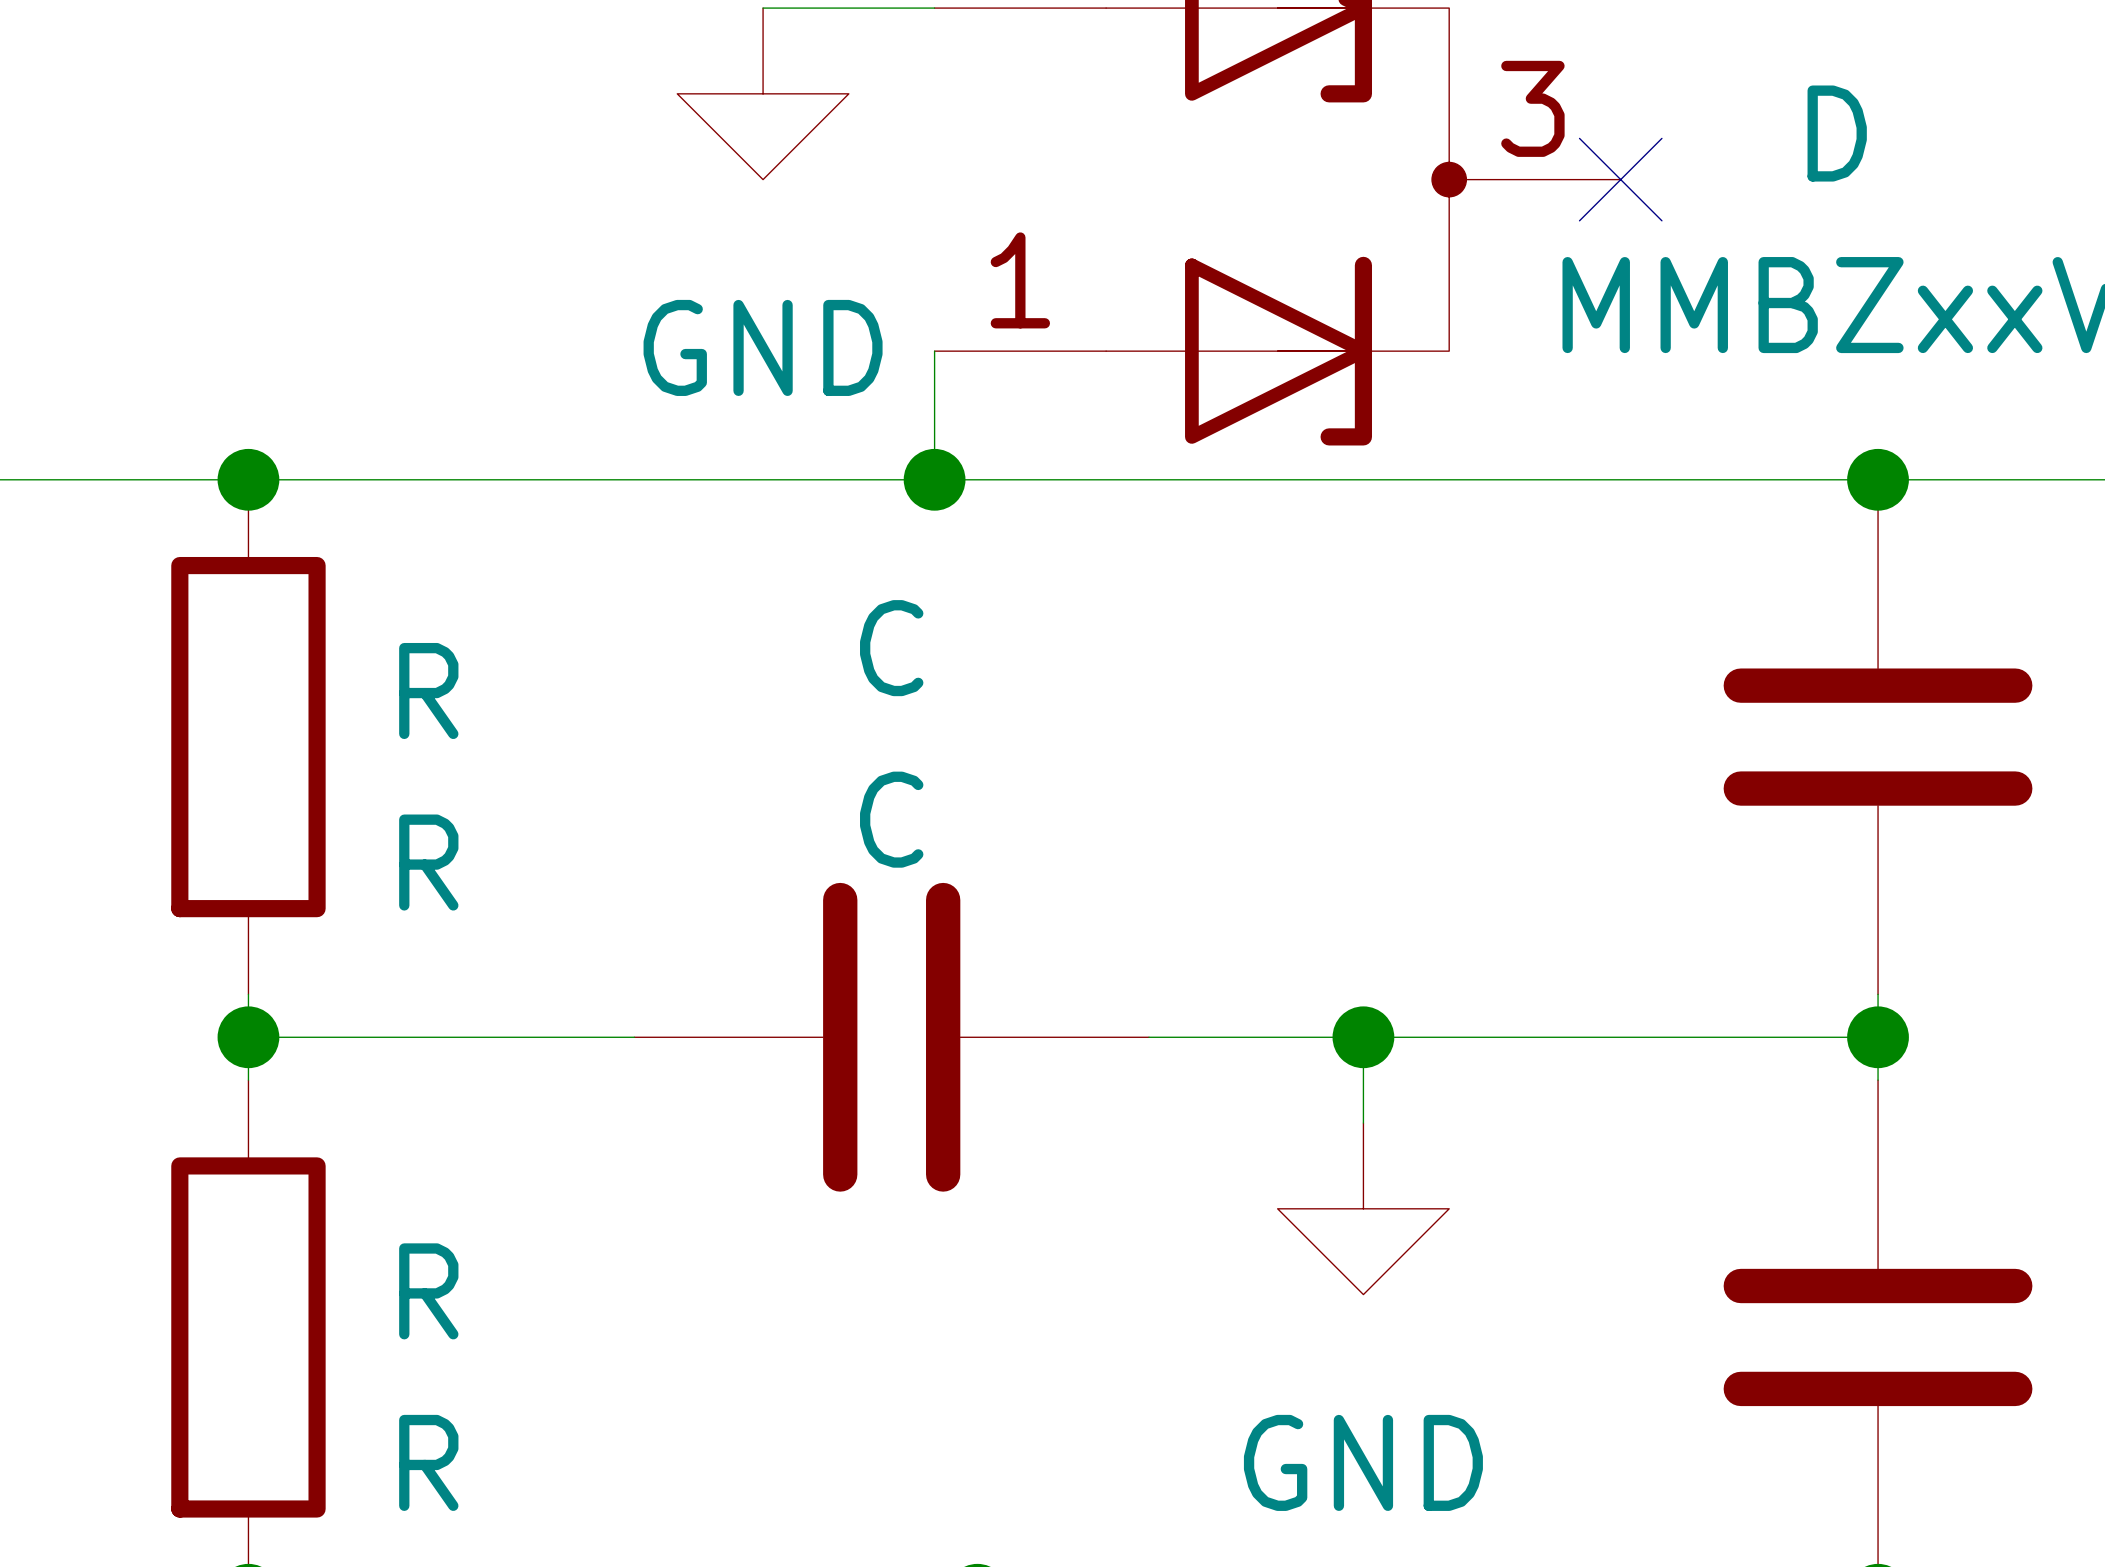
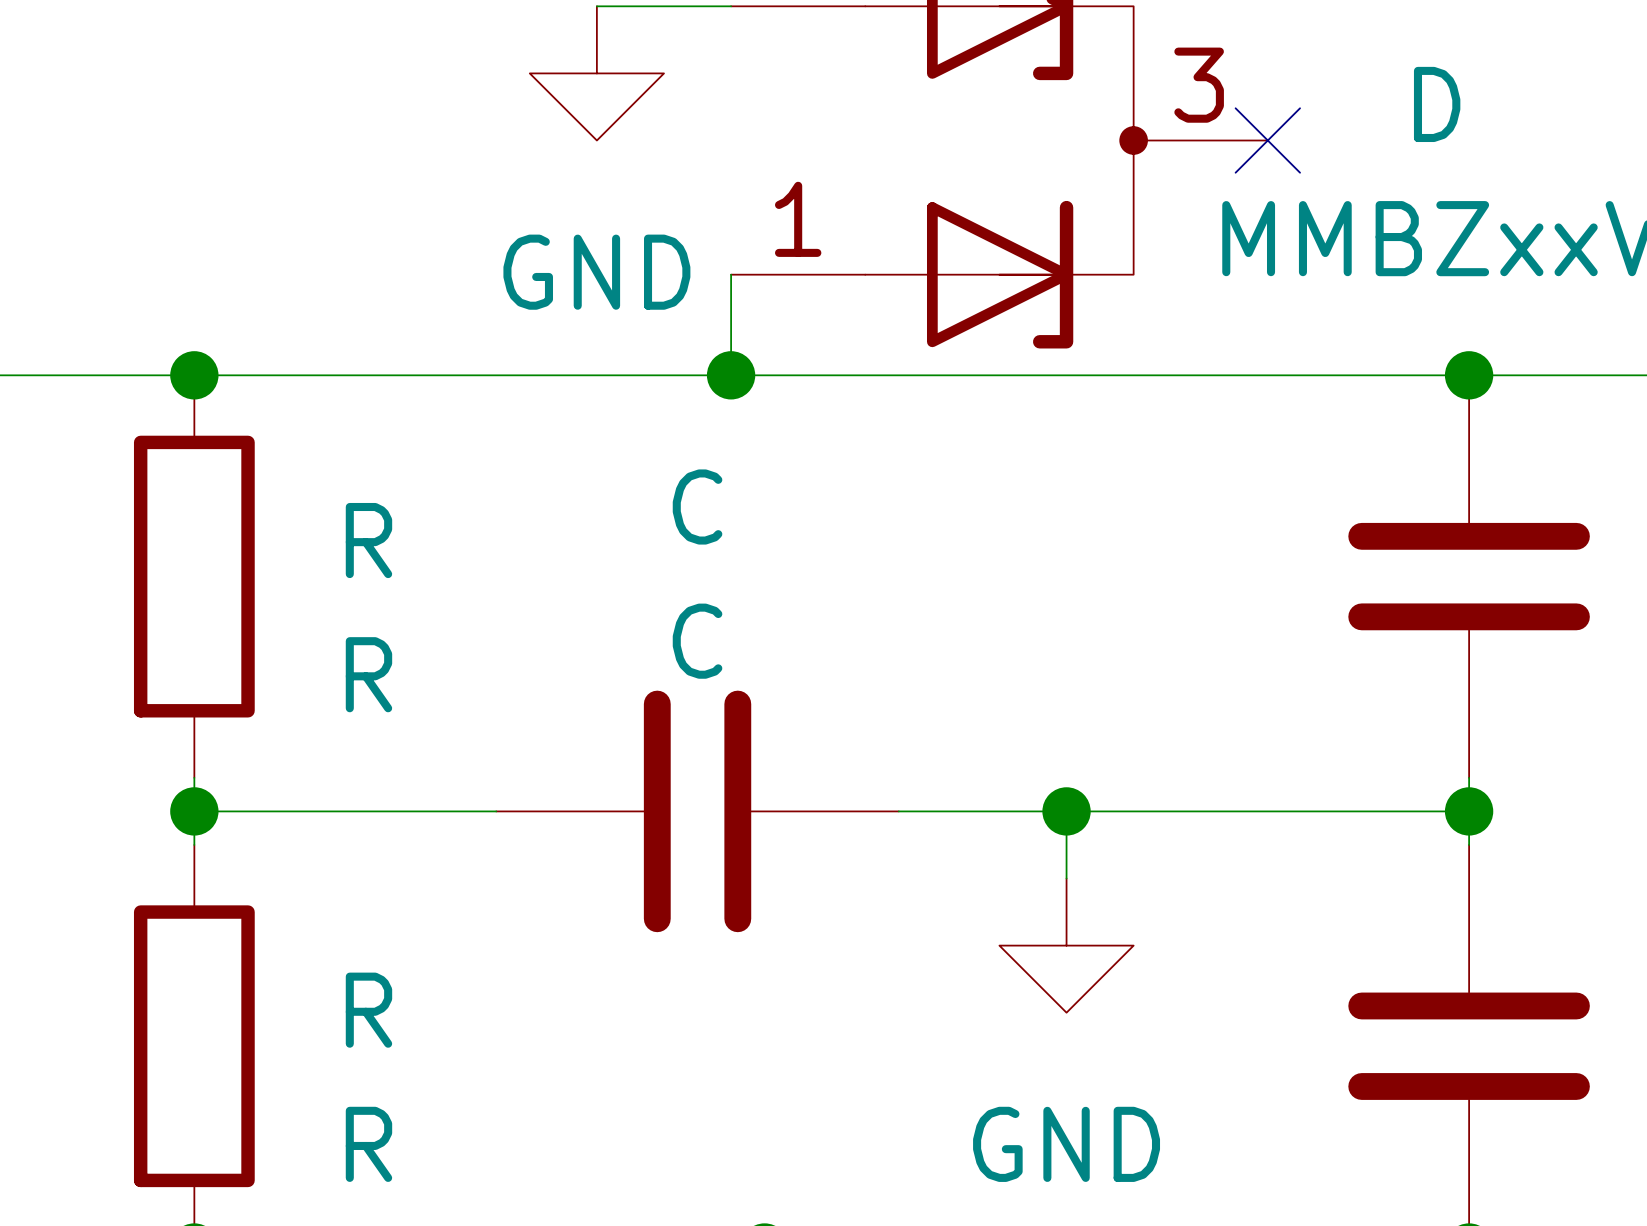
R name position: R (428, 691) -> R (368, 540)
R value position: R (428, 862) -> R (368, 674)
R name position: R (428, 1291) -> R (368, 1010)
R value position: R (428, 1462) -> R (368, 1144)

